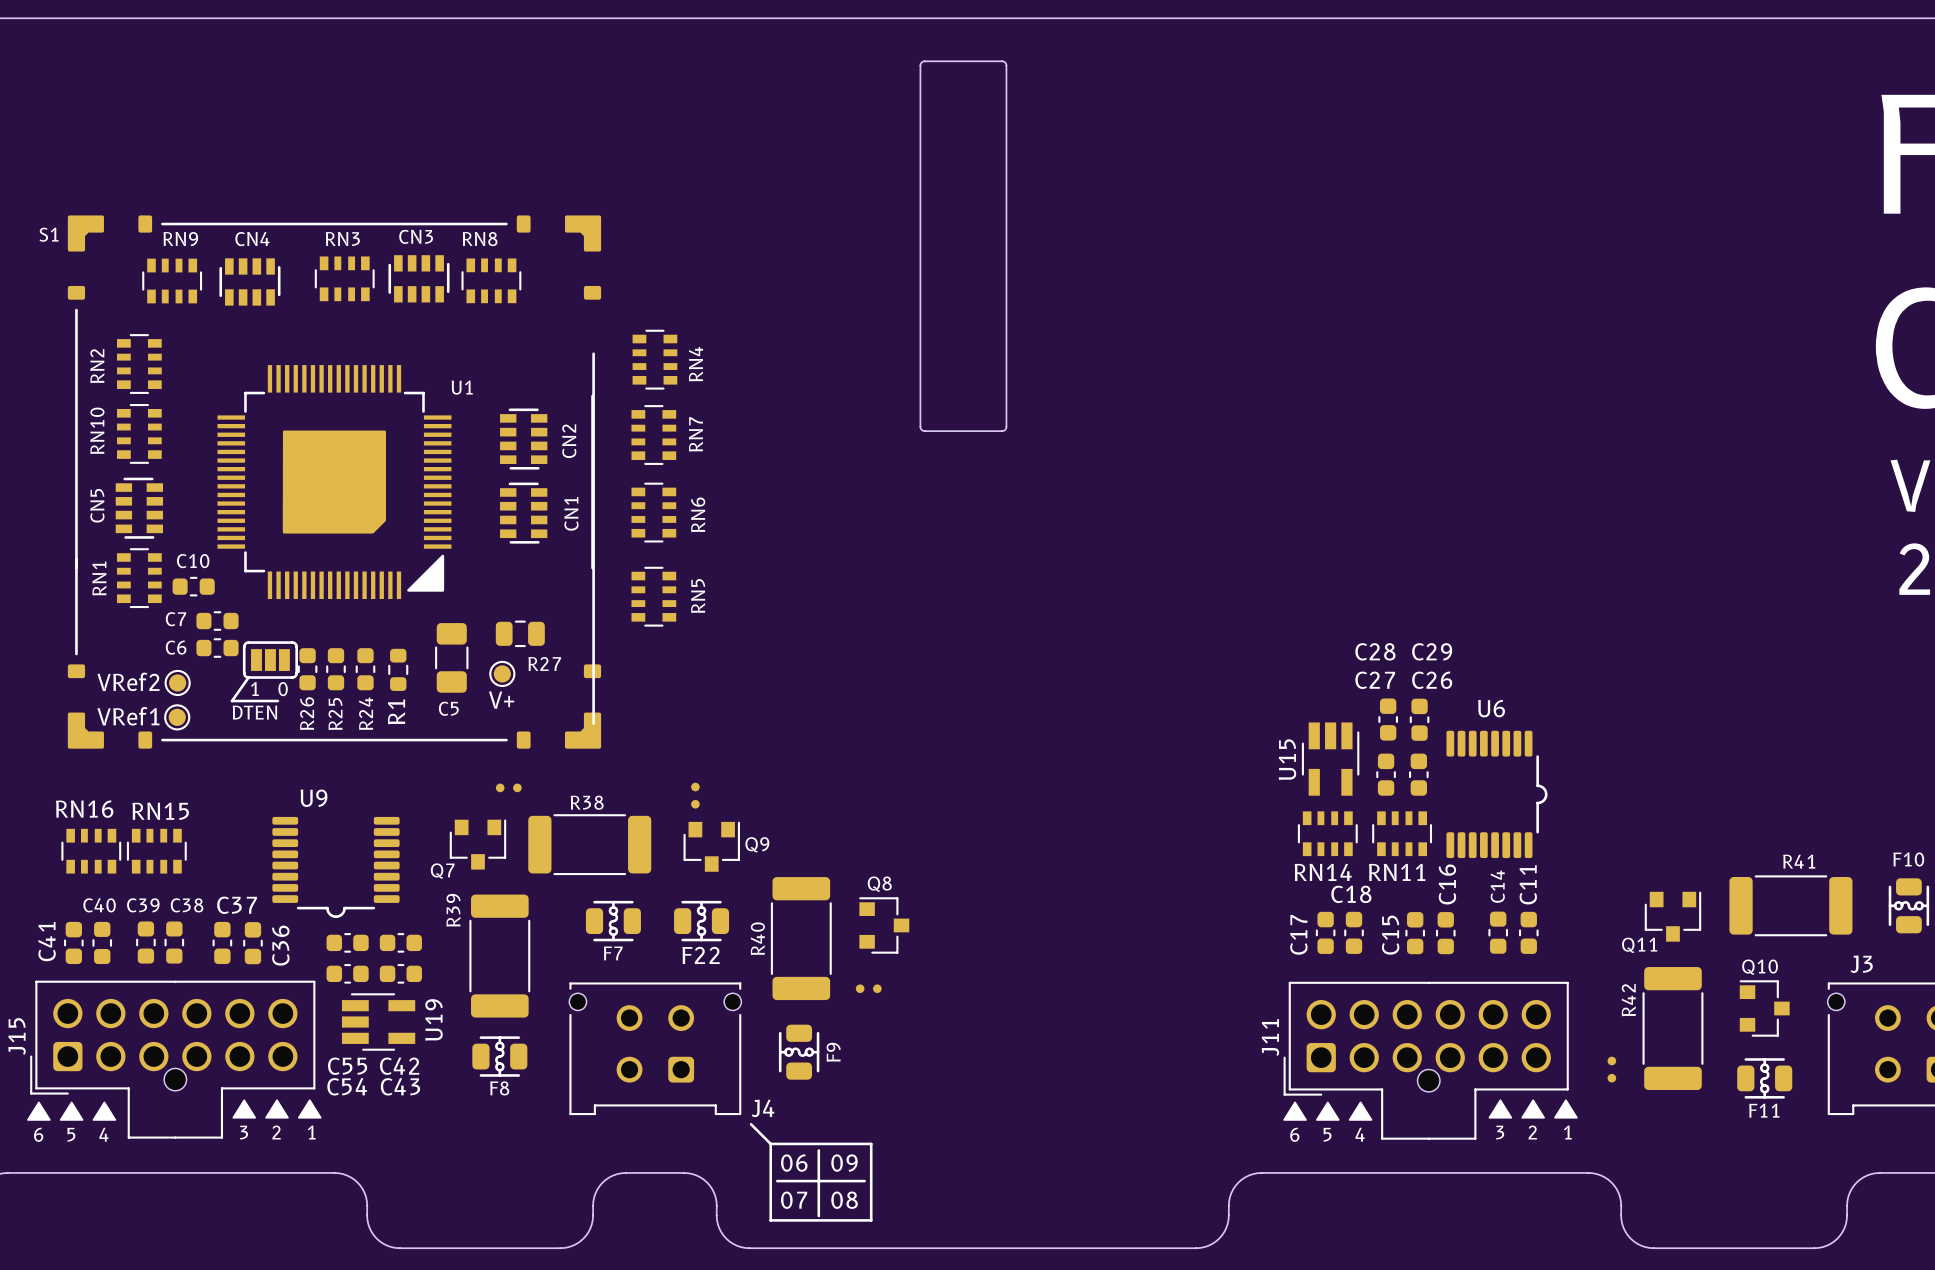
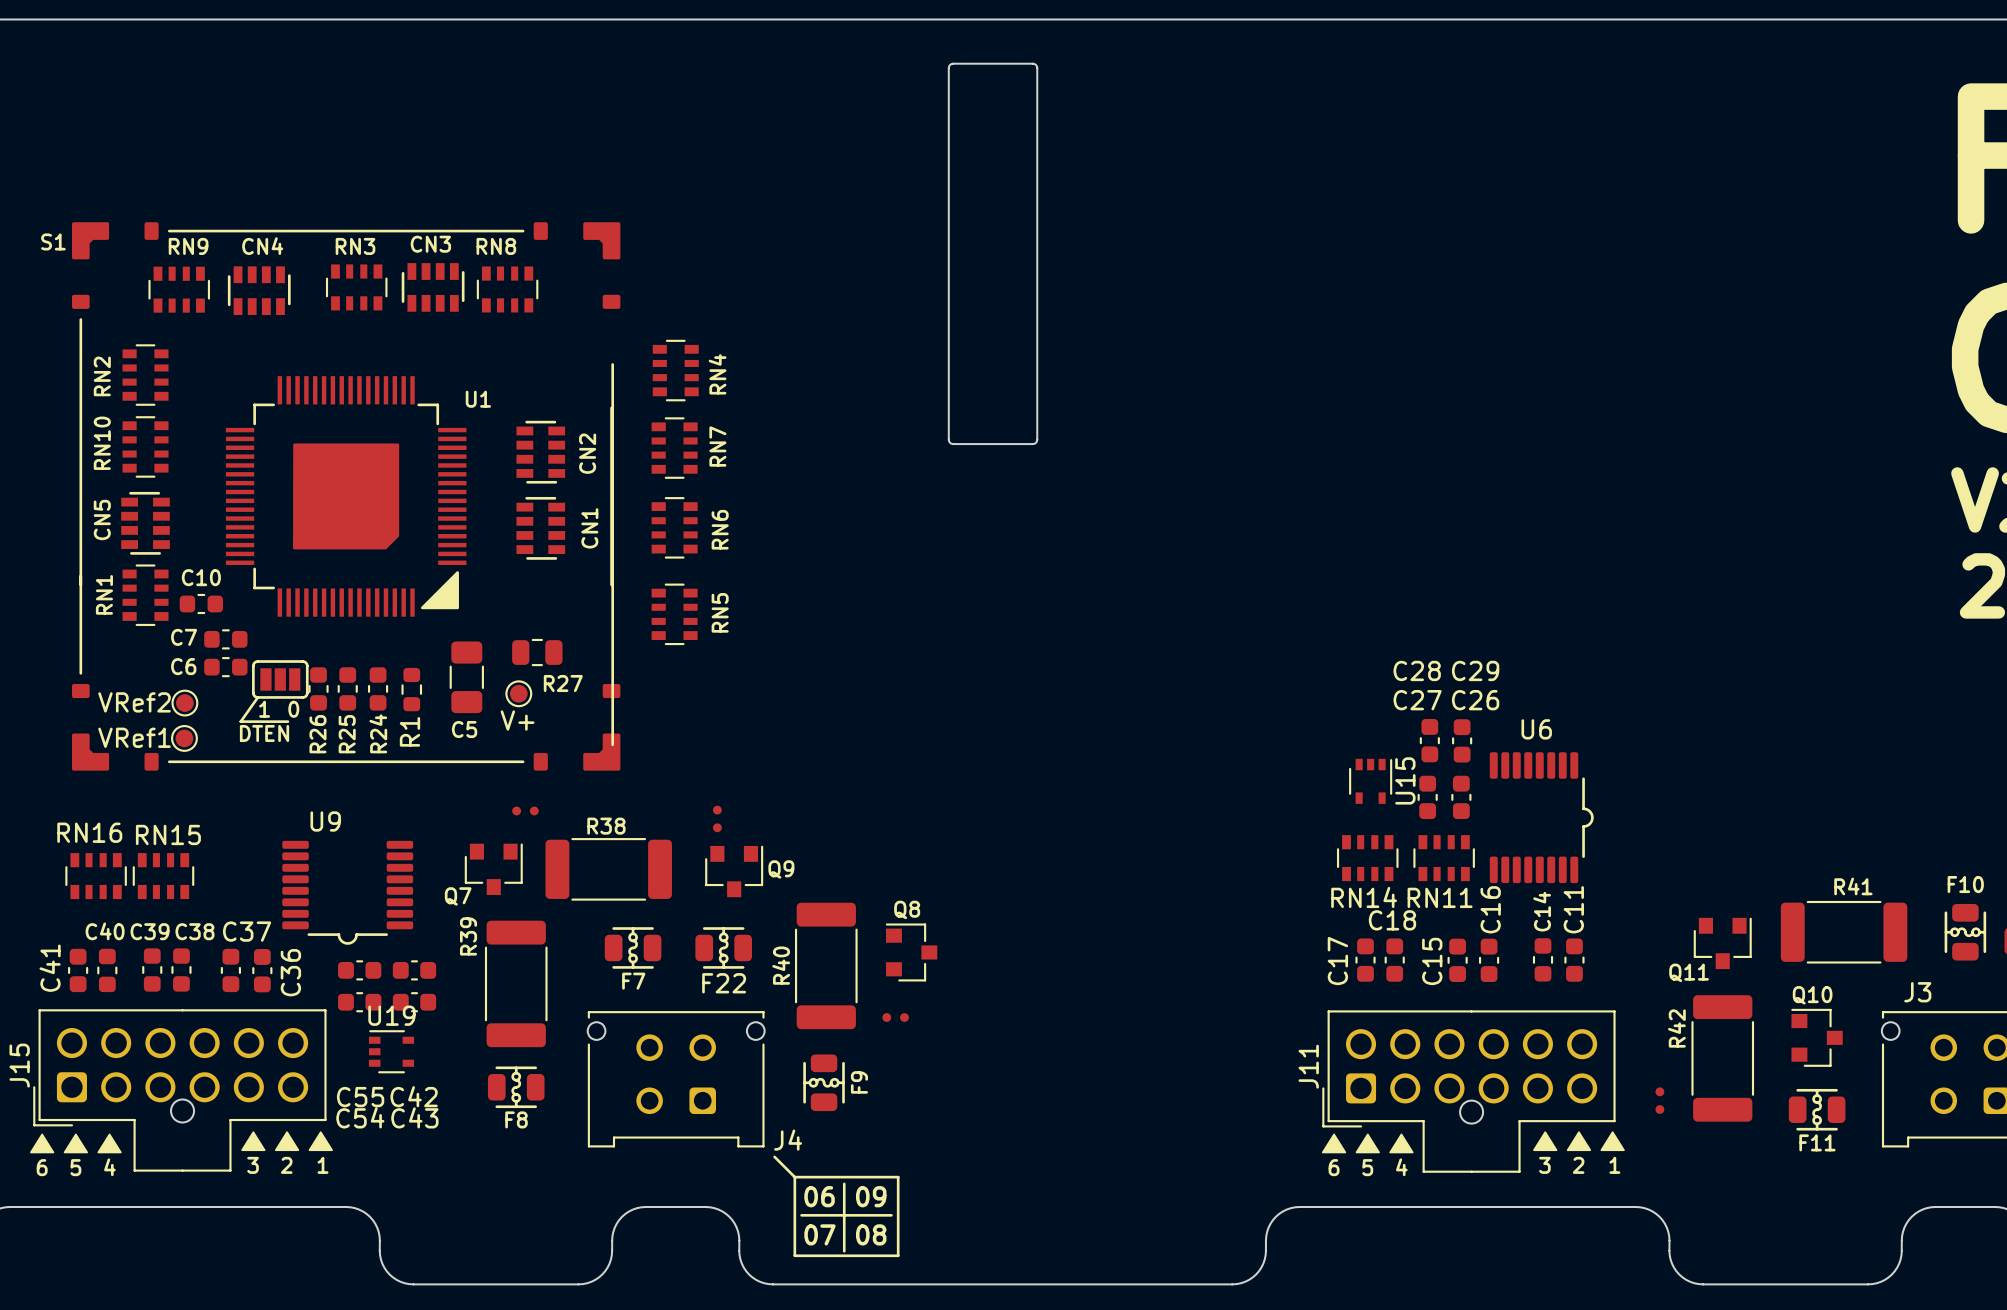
U15 footprint: [1301, 722, 1360, 796] -> [1349, 758, 1393, 804]
U15 name position: U15 (1287, 759) -> U15 (1405, 780)
U19 footprint: [341, 993, 416, 1051] -> [368, 1030, 415, 1074]
U19 name rotation: 0° (434, 1019) -> 90° clockwise (391, 1015)
U19 name position: U19 (434, 1019) -> U19 (391, 1015)

